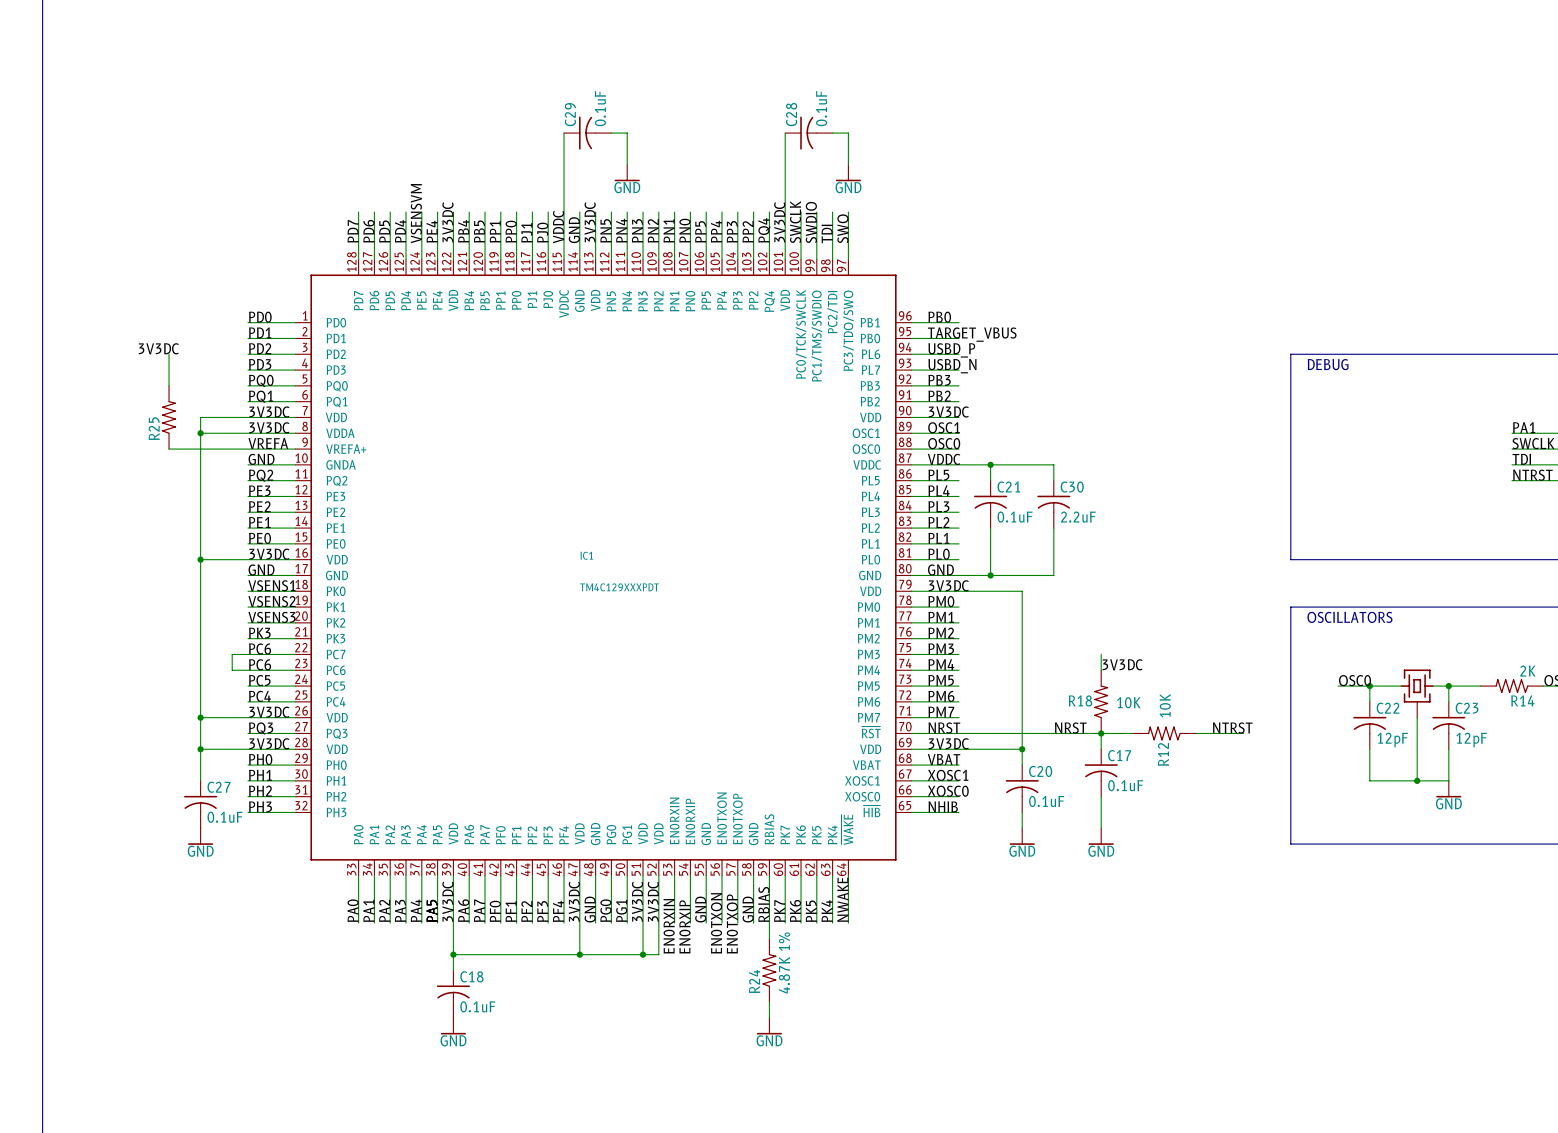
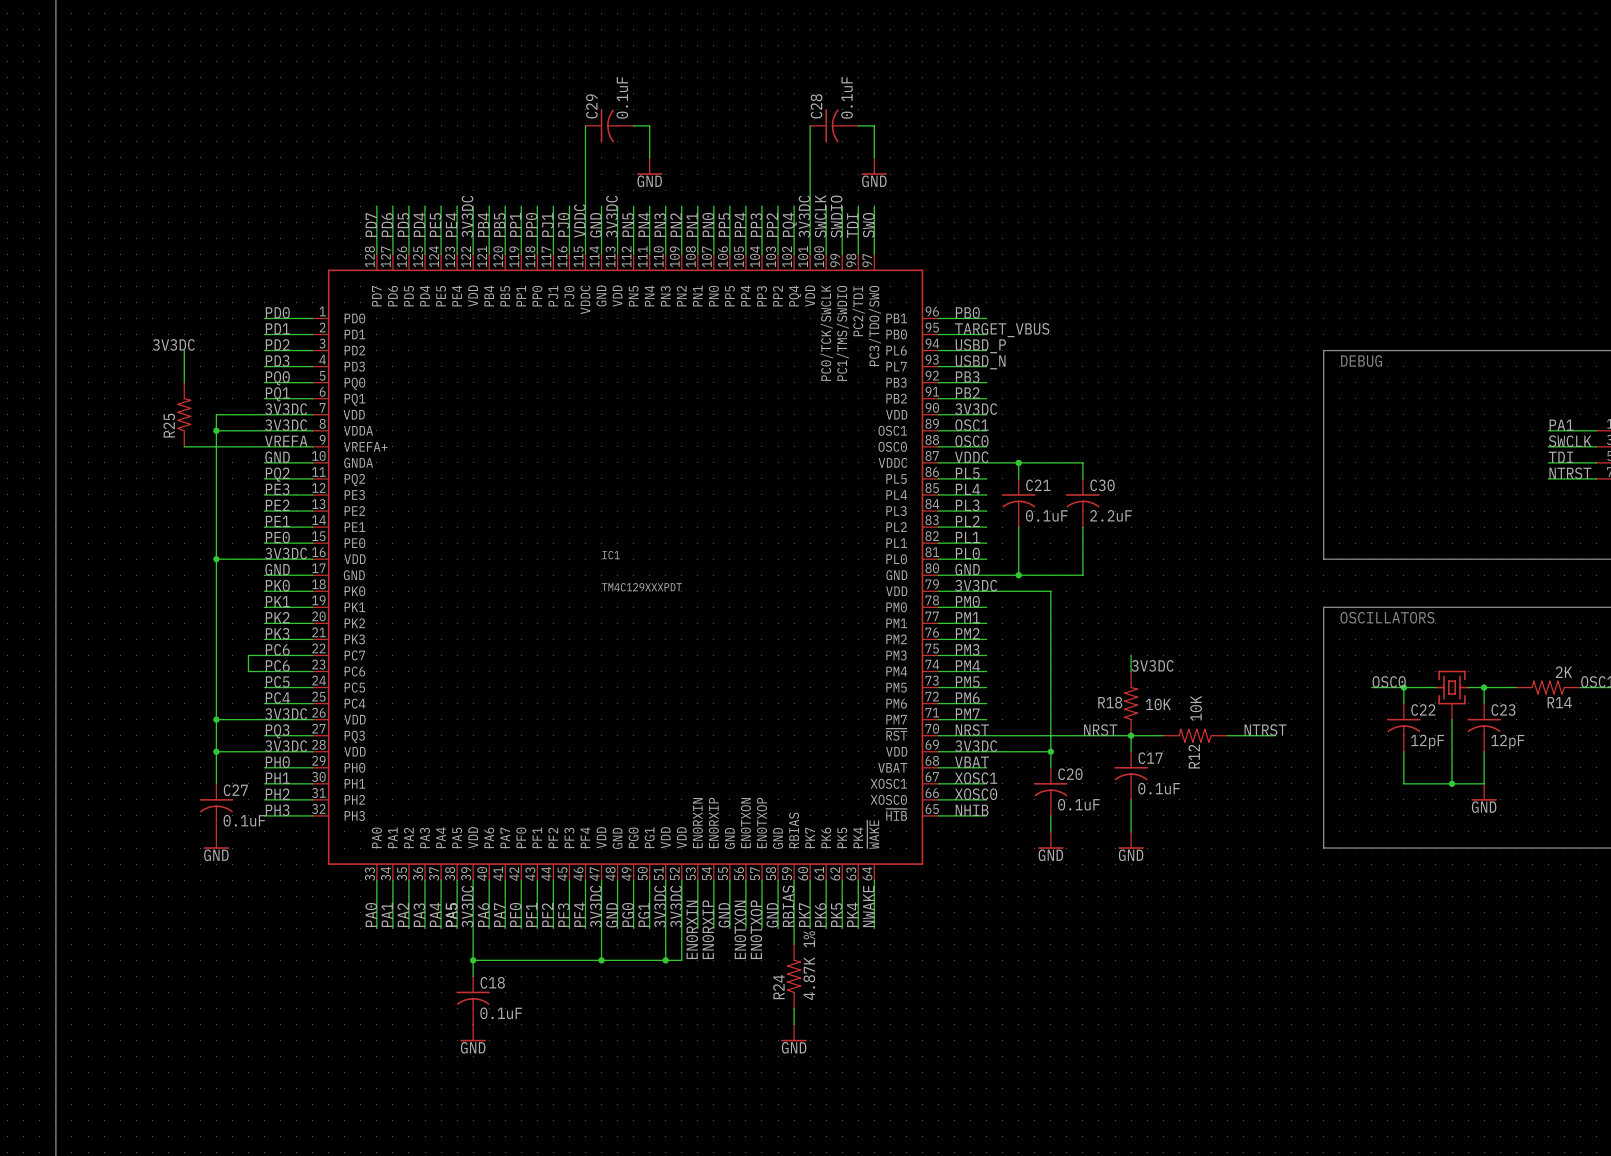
label: VSENSVM (416, 213) -> PE5 (435, 225)
label: VSENS1 (271, 585) -> PK0 (277, 585)
label: VSENS2 (271, 601) -> PK1 (277, 601)
label: VSENS3 (271, 617) -> PK2 (277, 617)

